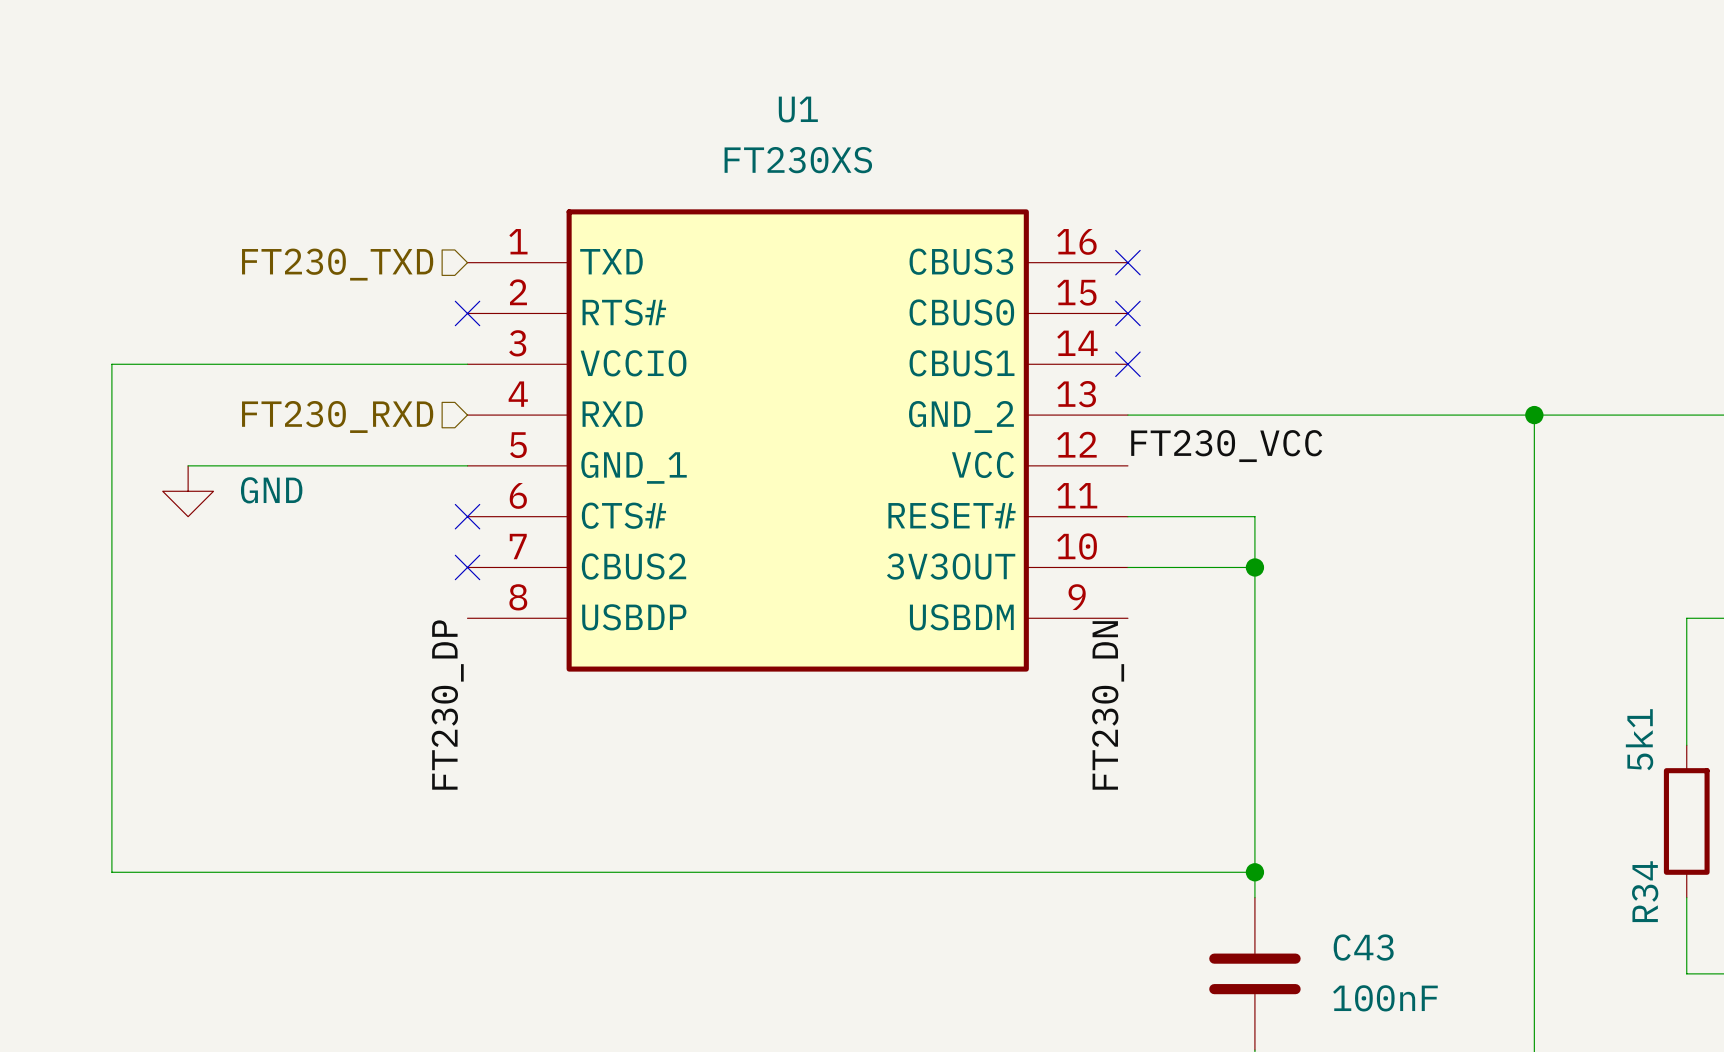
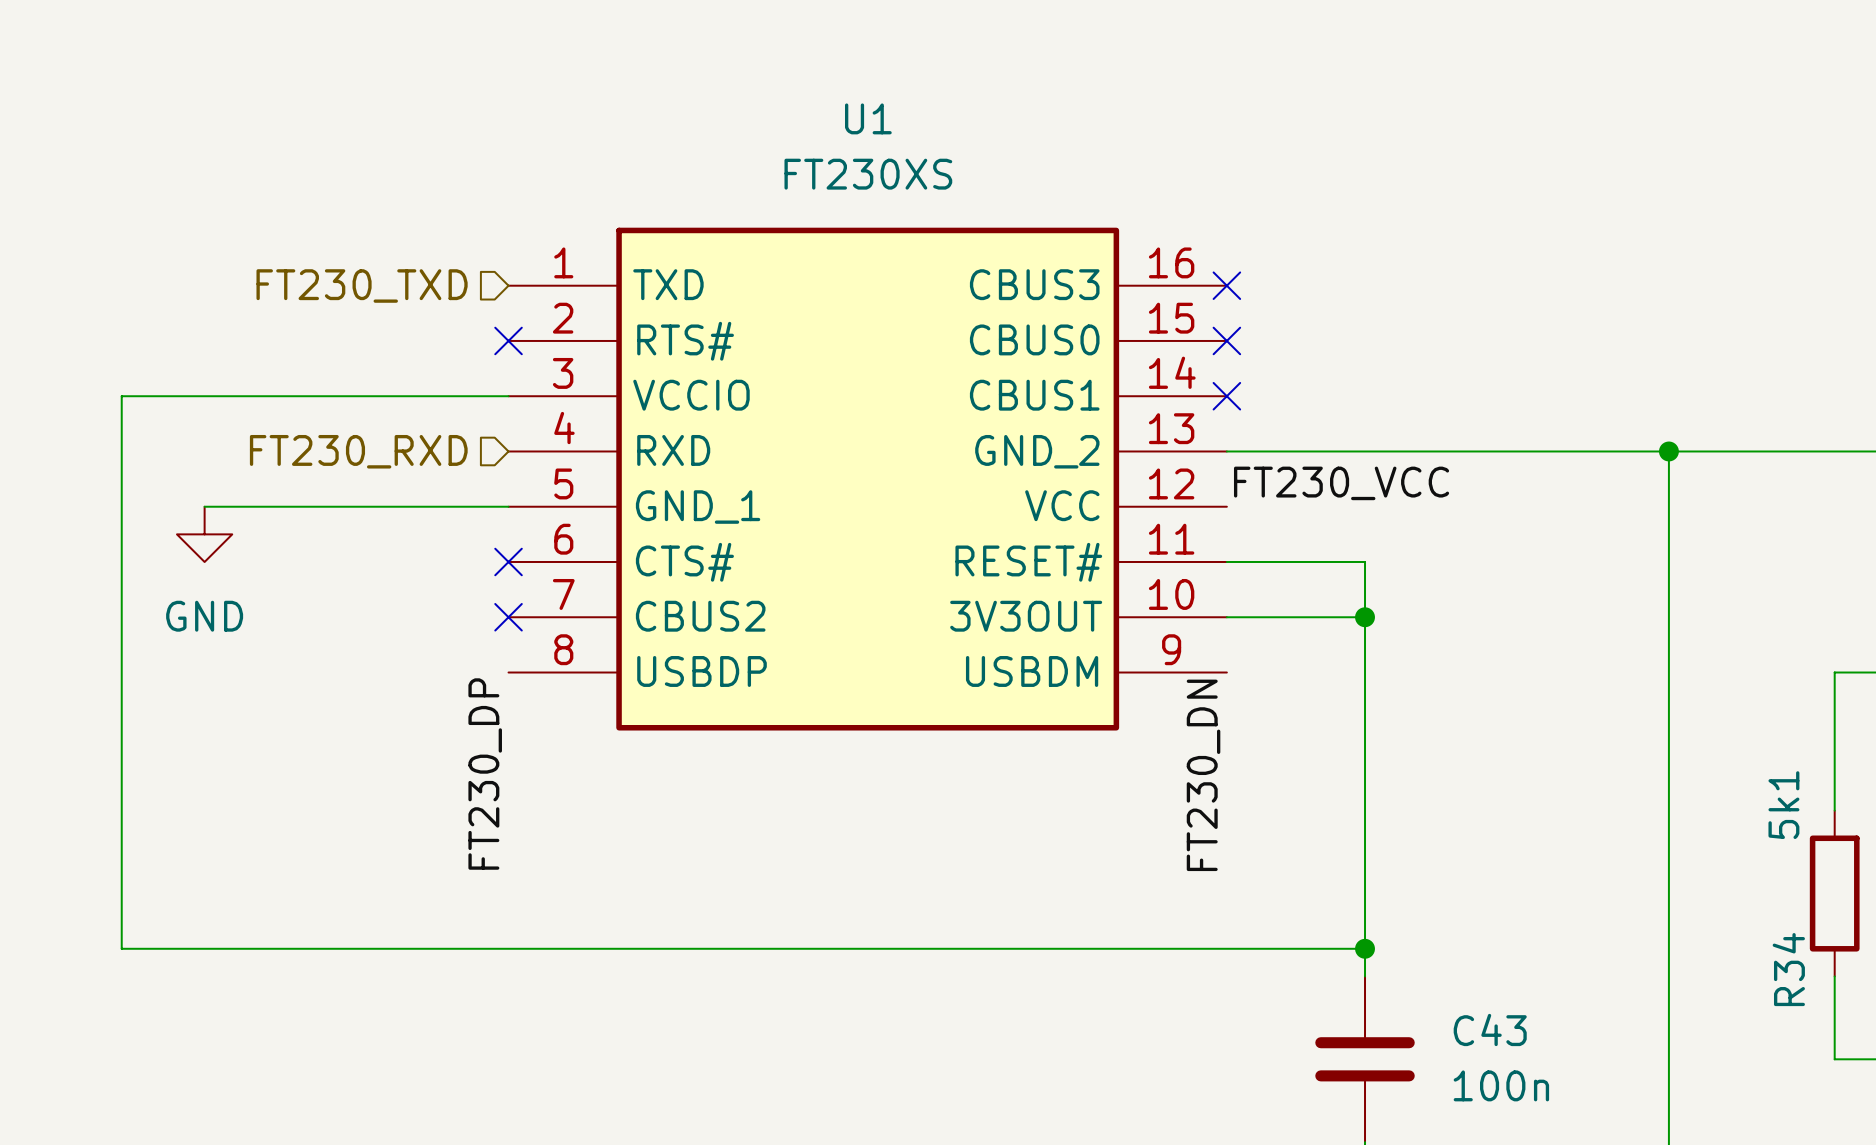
power symbol text position: GND (271, 490) -> GND (204, 616)
C43 value: 100nF (1385, 998) -> 100n (1501, 1085)

